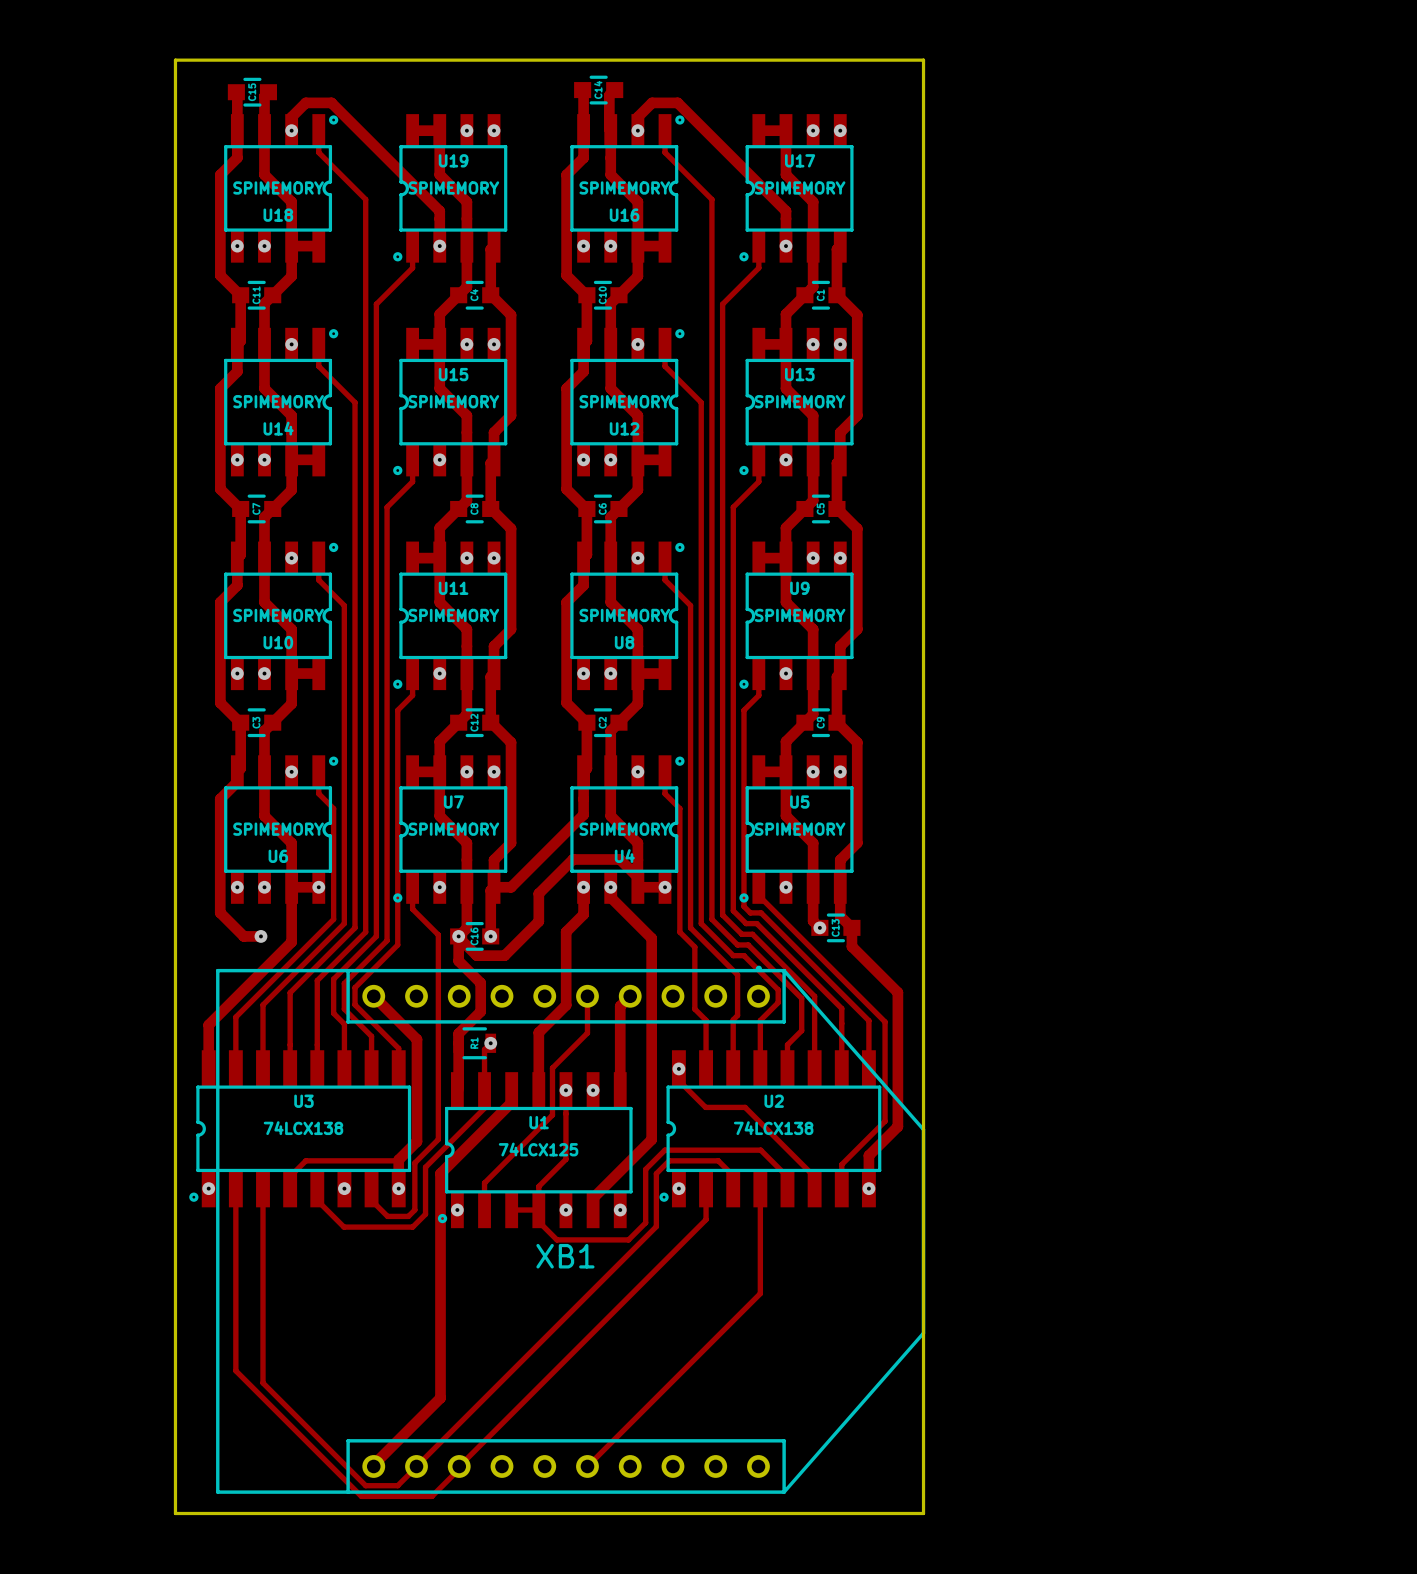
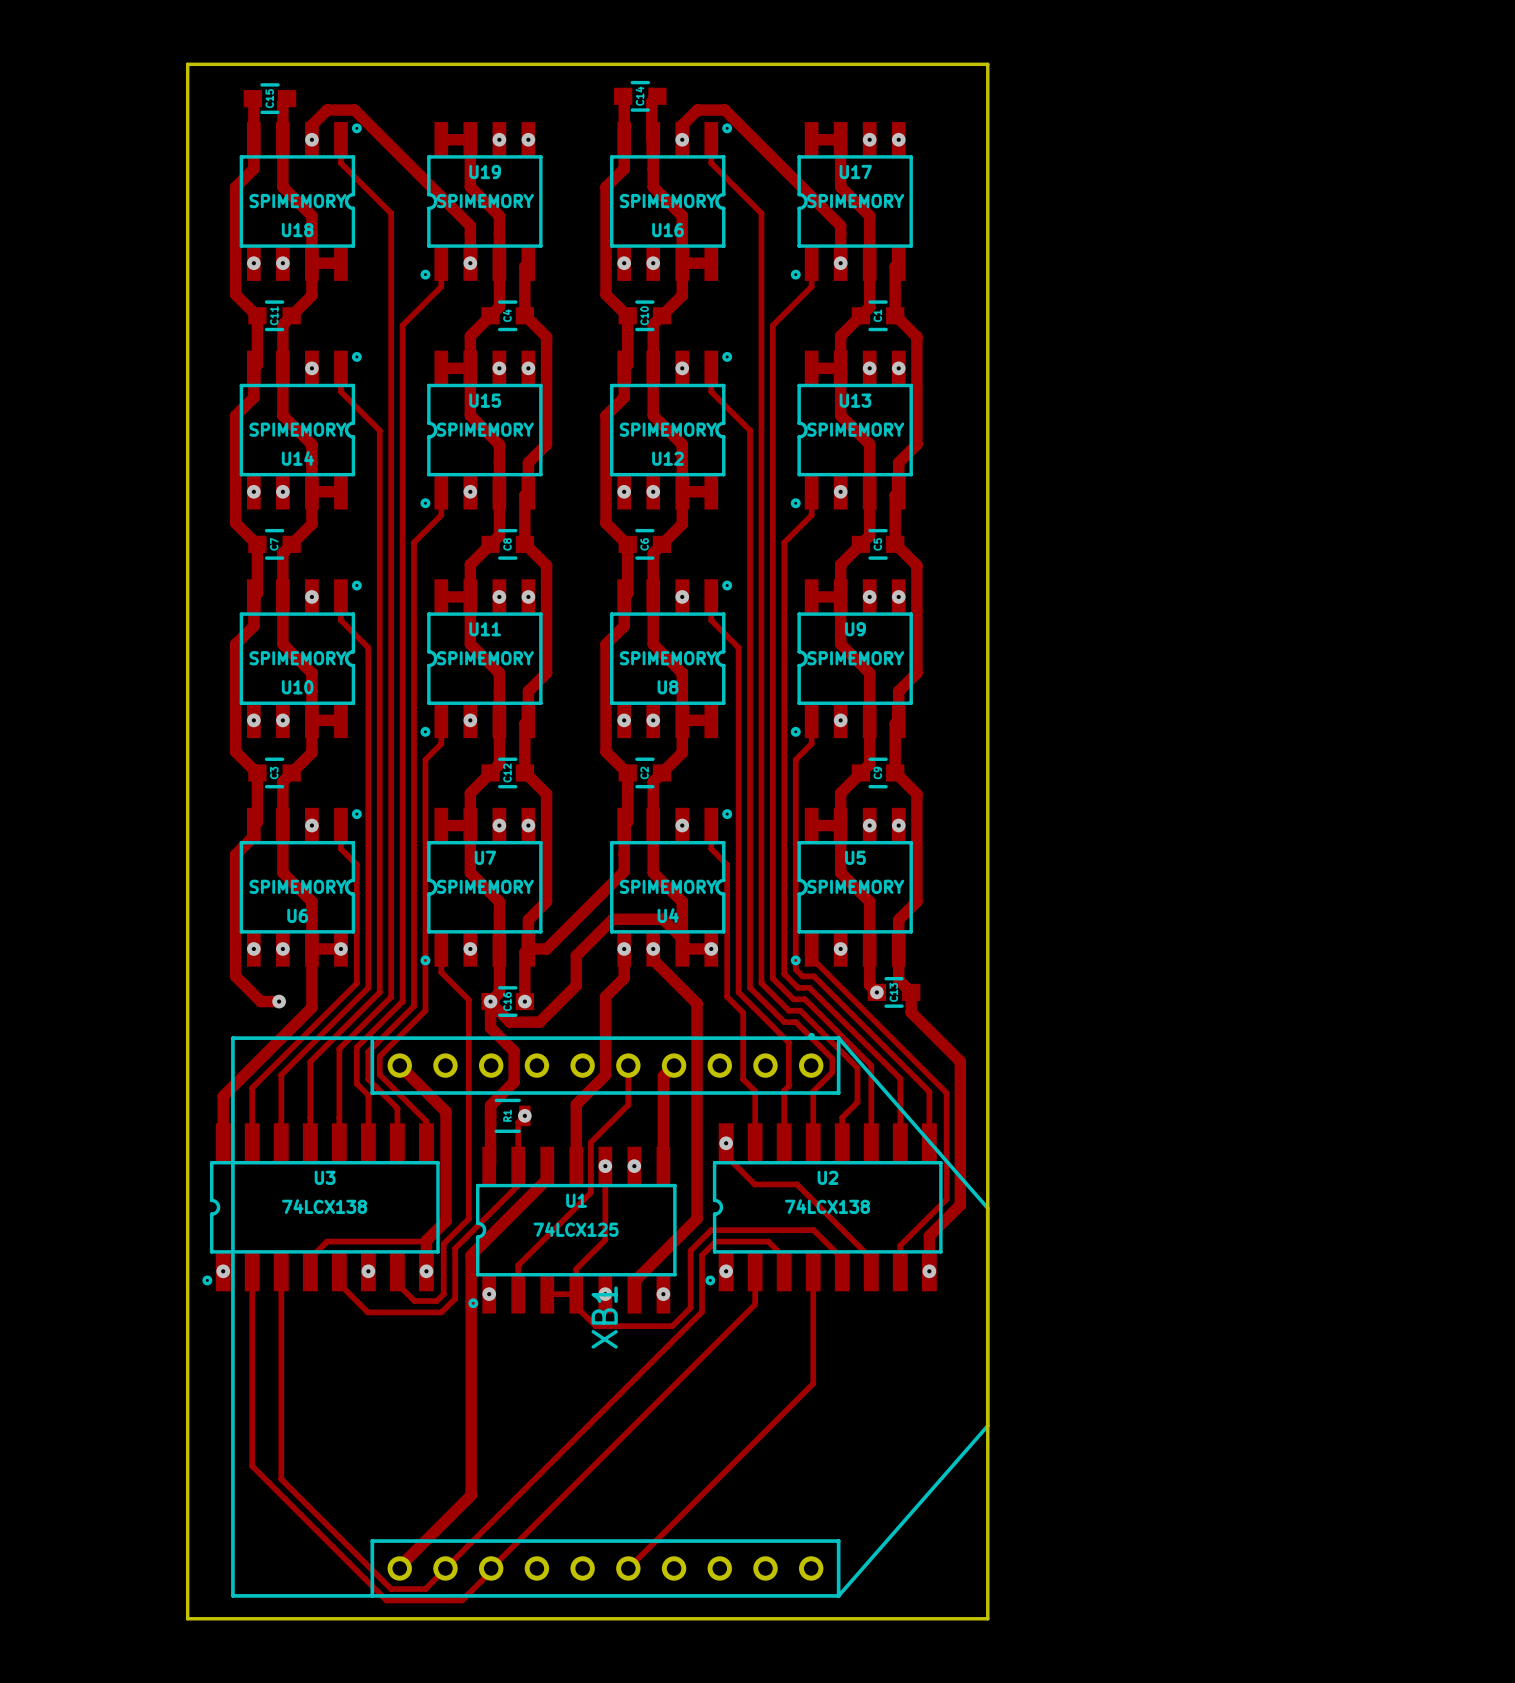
XB1 name rotation: 0° (565, 1256) -> 90° counterclockwise (604, 1317)

